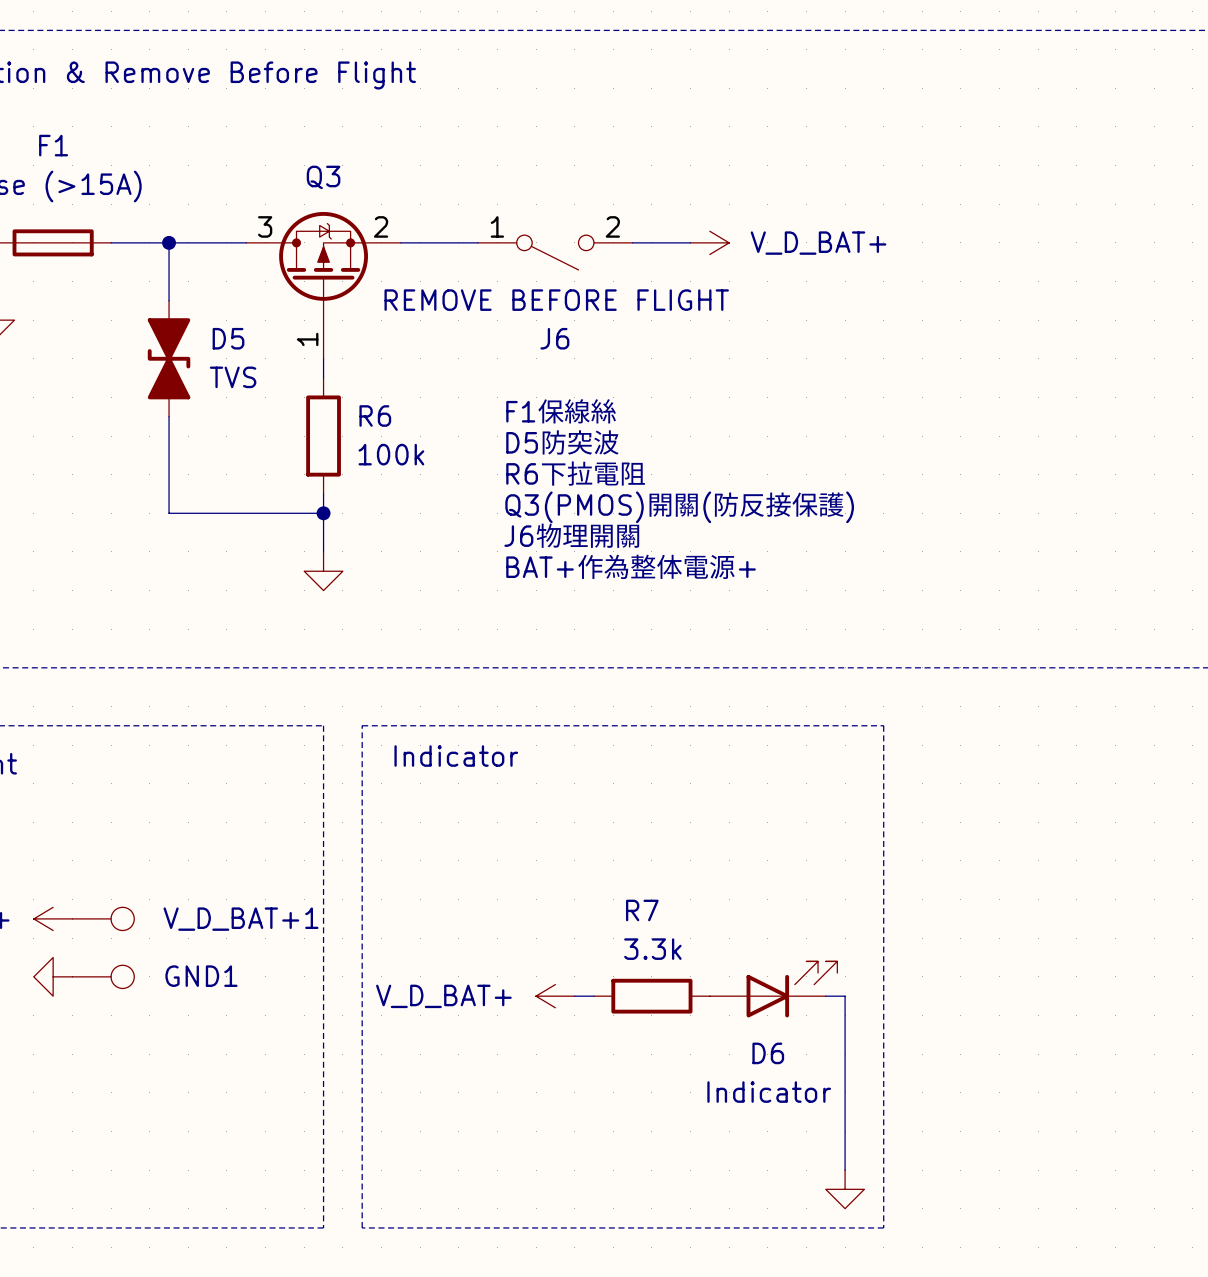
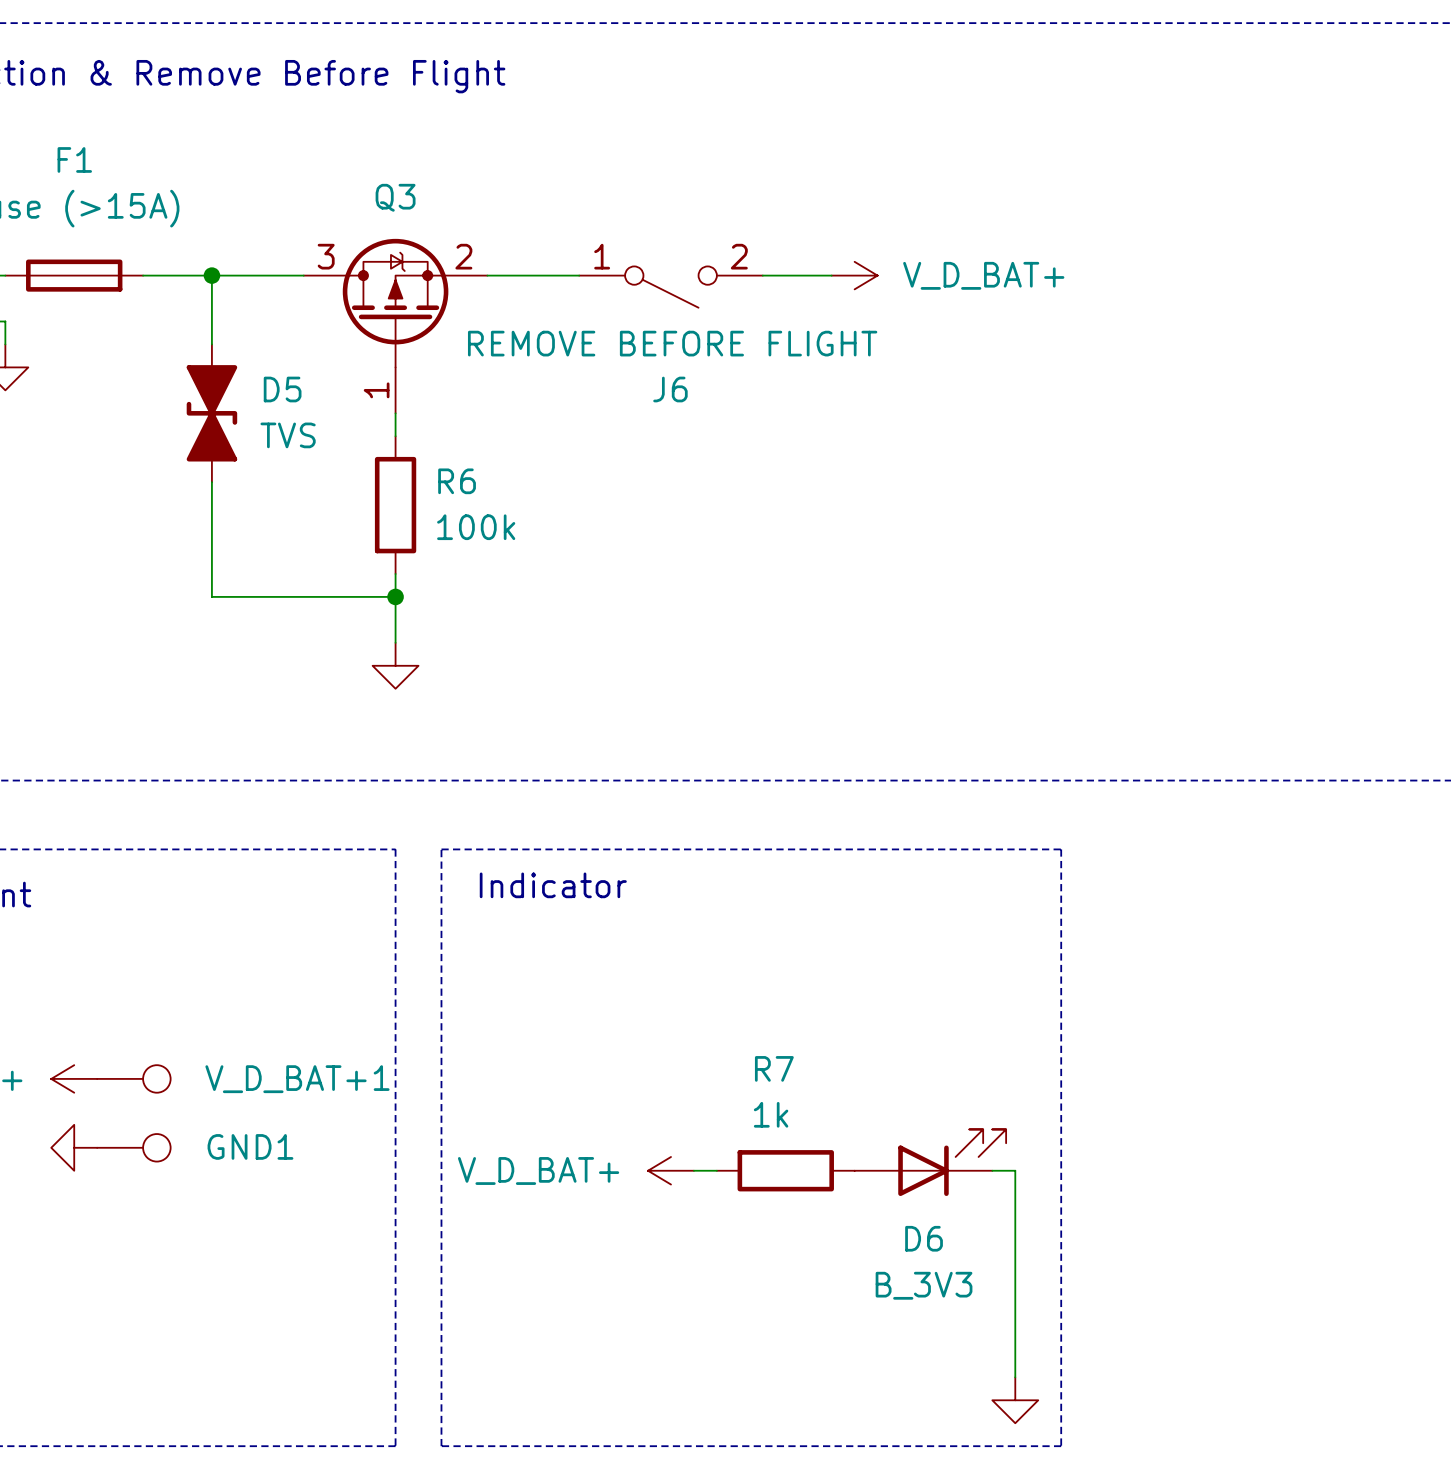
text: F1保線絲 (561, 411) -> none
text: D5防突波 (563, 442) -> none
text: R6下拉電阻 (576, 473) -> none
text: Q3(PMOS)開關(防反接保護) (679, 507) -> none
text: J6物理開關 (572, 535) -> none
text: BAT+作為整体電源+ (631, 566) -> none
R7 value: 3.3k (652, 949) -> 1k (771, 1114)
D6 value: Indicator (769, 1092) -> B_3V3 (924, 1285)

